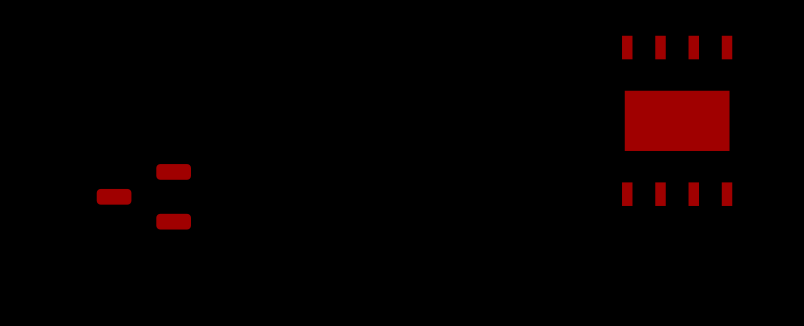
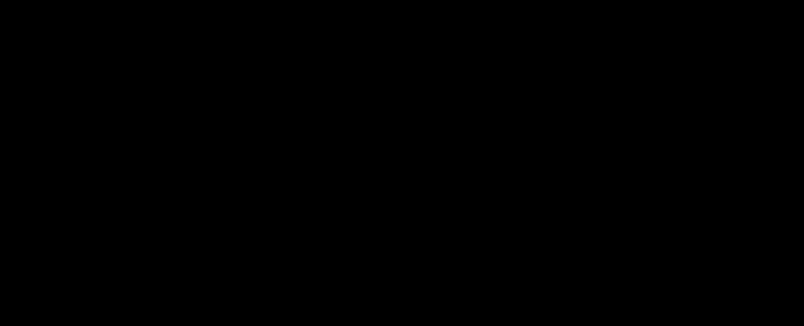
part: (677, 120) -> none
part: (143, 196) -> none

